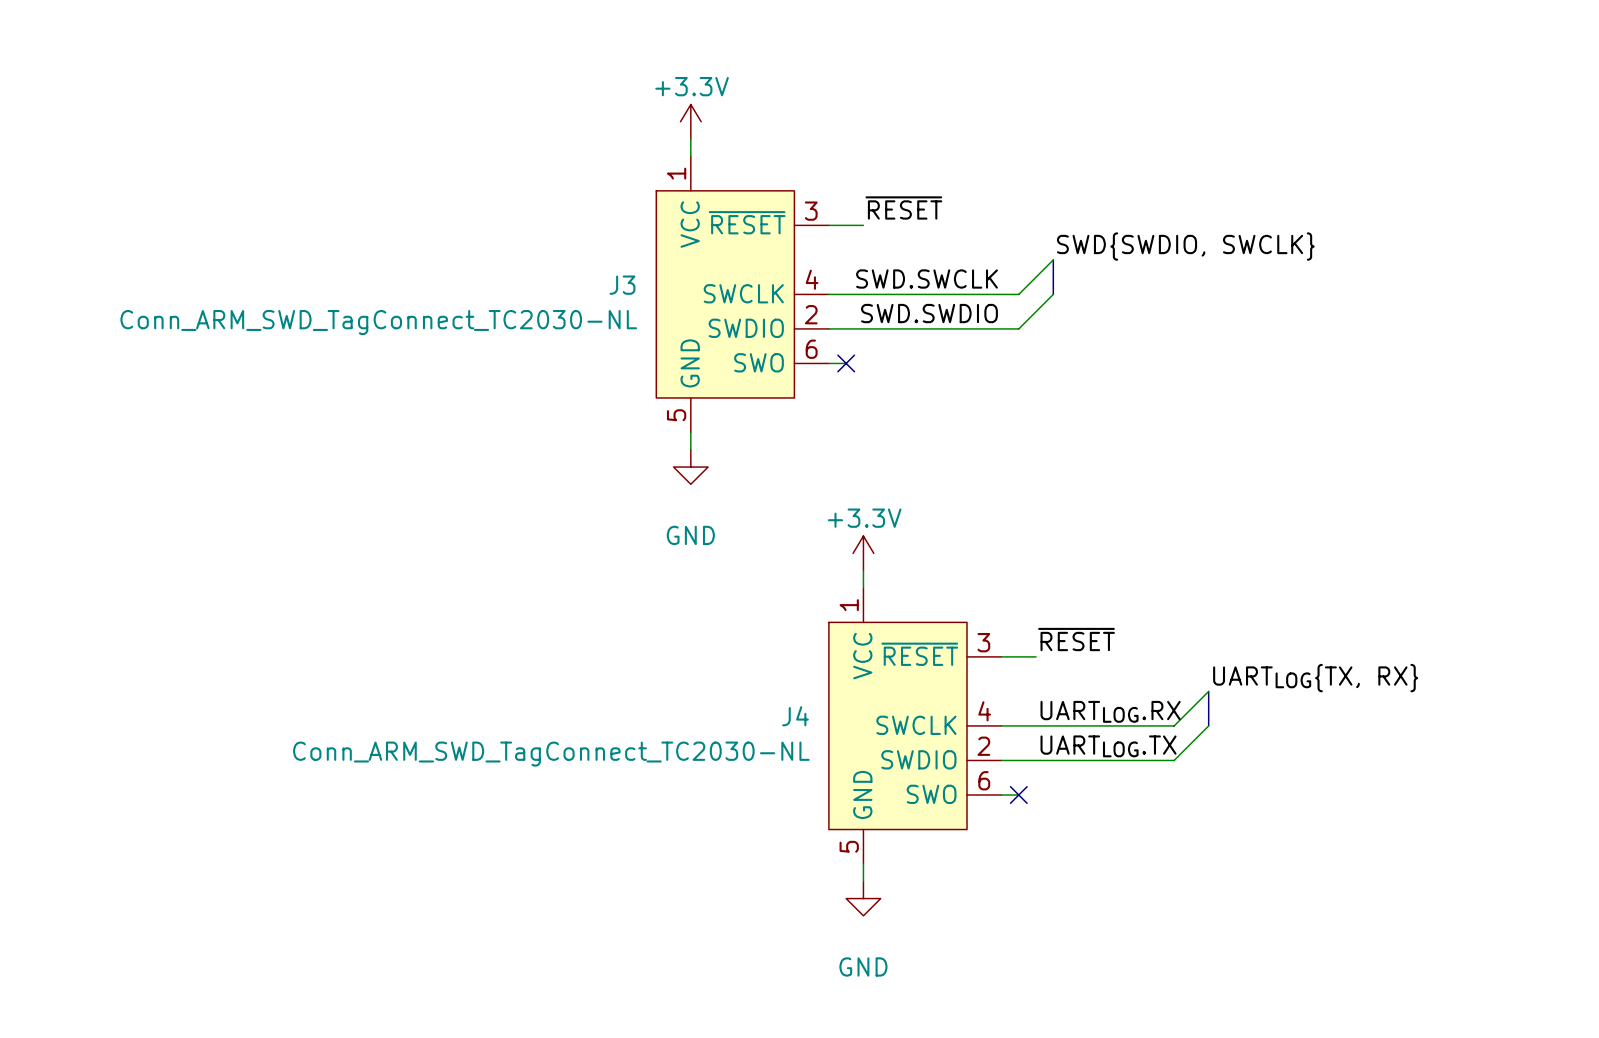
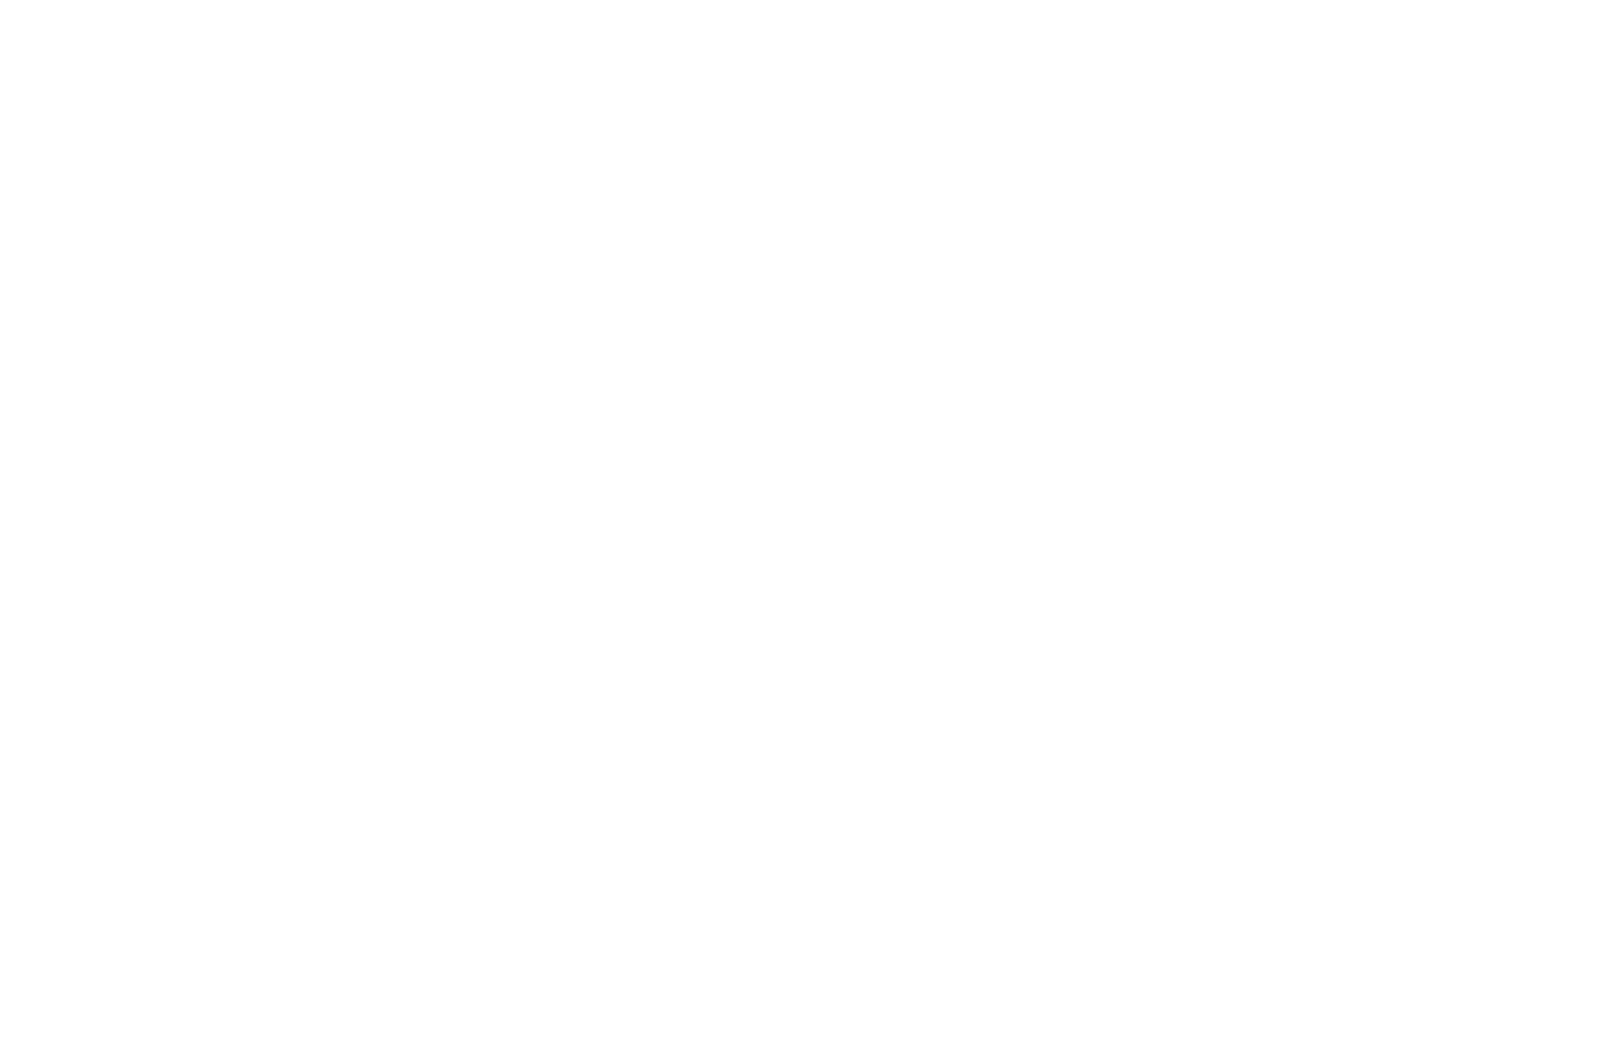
power symbol: +3.3V (690, 121) -> none
wire: (690, 139) (690, 156) -> none
label: ~{RESET} (903, 207) -> none
wire: (828, 225) (863, 225) -> none
label: SWD{SWDIO, SWCLK} (1185, 246) -> none
wire: (1053, 259) (1018, 294) (828, 294) -> none
bus: (1053, 259) (1053, 294) -> none
label: SWD.SWCLK (927, 279) -> none
J3: Conn_ARM_SWD_TagConnect_TC2030-NL (742, 294) -> none
wire: (1053, 294) (1018, 328) (828, 328) -> none
label: SWD.SWDIO (929, 313) -> none
wire: (828, 363) (846, 363) -> none
no-connect mark: (846, 363) -> none
wire: (690, 432) (690, 449) -> none
power symbol: GND (690, 467) -> none
power symbol: +3.3V (863, 553) -> none
wire: (863, 570) (863, 587) -> none
label: ~{RESET} (1076, 639) -> none
wire: (1001, 656) (1036, 656) -> none
label: UARTLOG{TX, RX} (1315, 678) -> none
wire: (1208, 691) (1174, 725) (1001, 725) -> none
bus: (1208, 691) (1208, 725) -> none
label: UARTLOG.RX (1110, 711) -> none
J4: Conn_ARM_SWD_TagConnect_TC2030-NL (915, 725) -> none
wire: (1208, 725) (1174, 760) (1001, 760) -> none
label: UARTLOG.TX (1108, 746) -> none
wire: (1001, 795) (1018, 795) -> none
no-connect mark: (1018, 795) -> none
wire: (863, 864) (863, 881) -> none
power symbol: GND (863, 898) -> none

